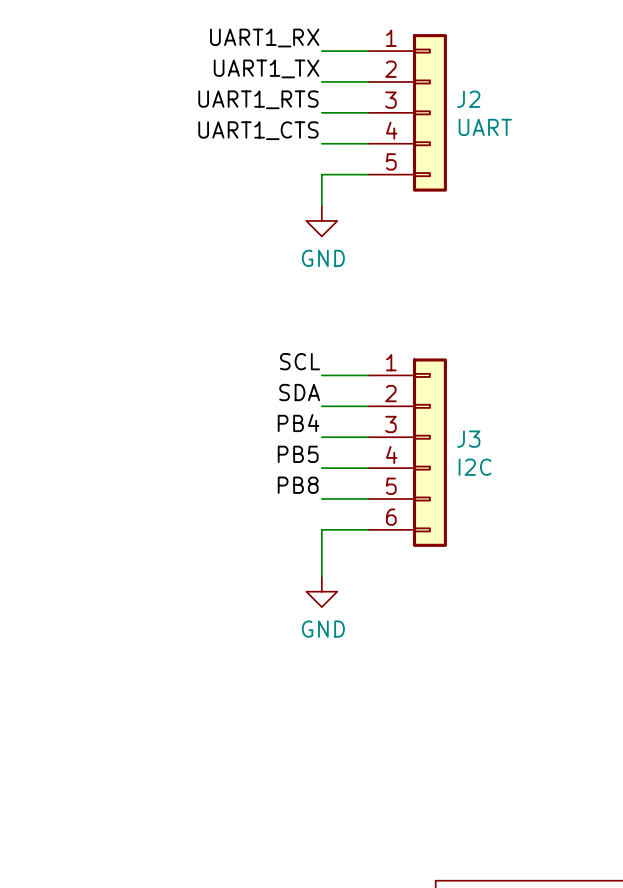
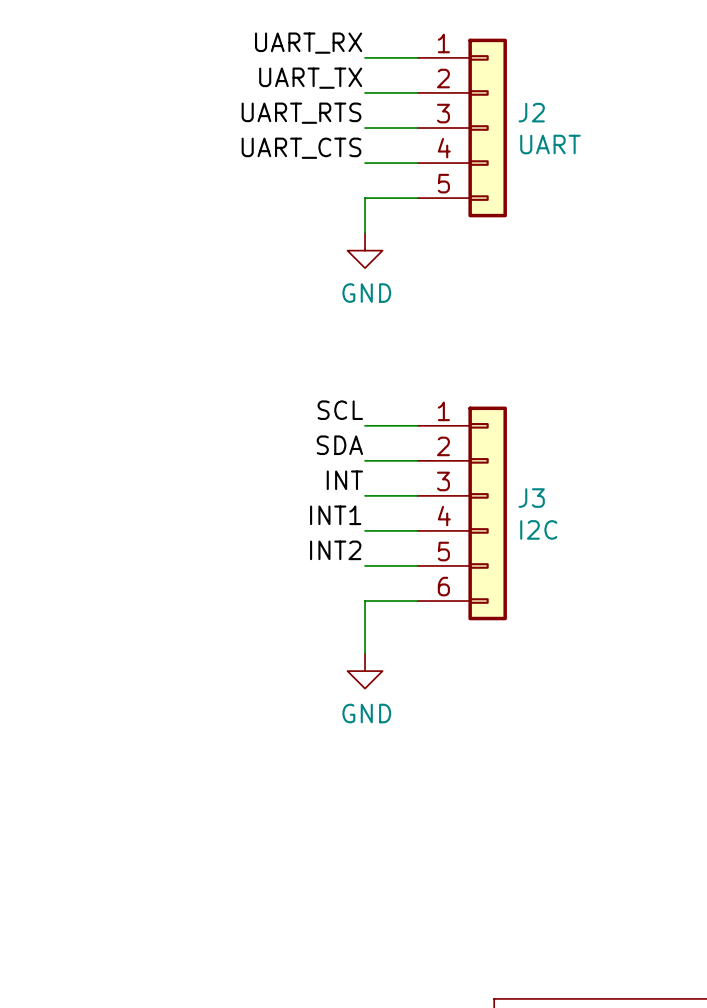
label: UART1_RX (264, 38) -> UART_RX (308, 43)
label: UART1_TX (266, 68) -> UART_TX (310, 78)
label: UART1_RTS (258, 99) -> UART_RTS (301, 113)
label: UART1_CTS (258, 130) -> UART_CTS (301, 148)
label: PB4 (298, 423) -> INT (344, 480)
label: PB5 (298, 454) -> INT1 (335, 515)
label: PB8 (298, 485) -> INT2 (335, 550)

